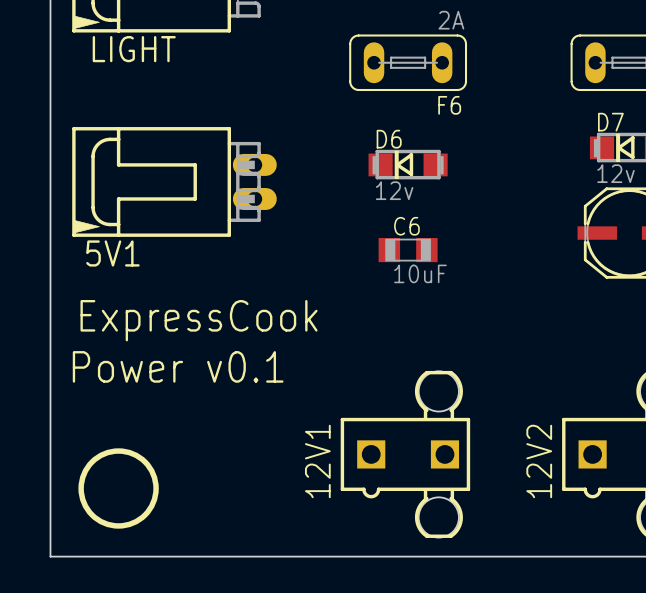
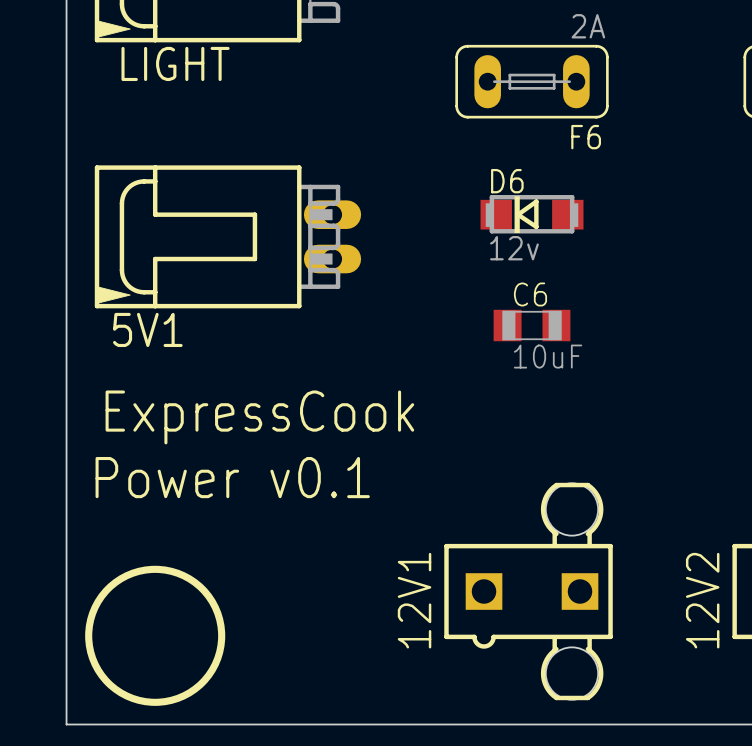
drawing shape: [78, 448, 159, 529] -> [85, 565, 226, 706]

